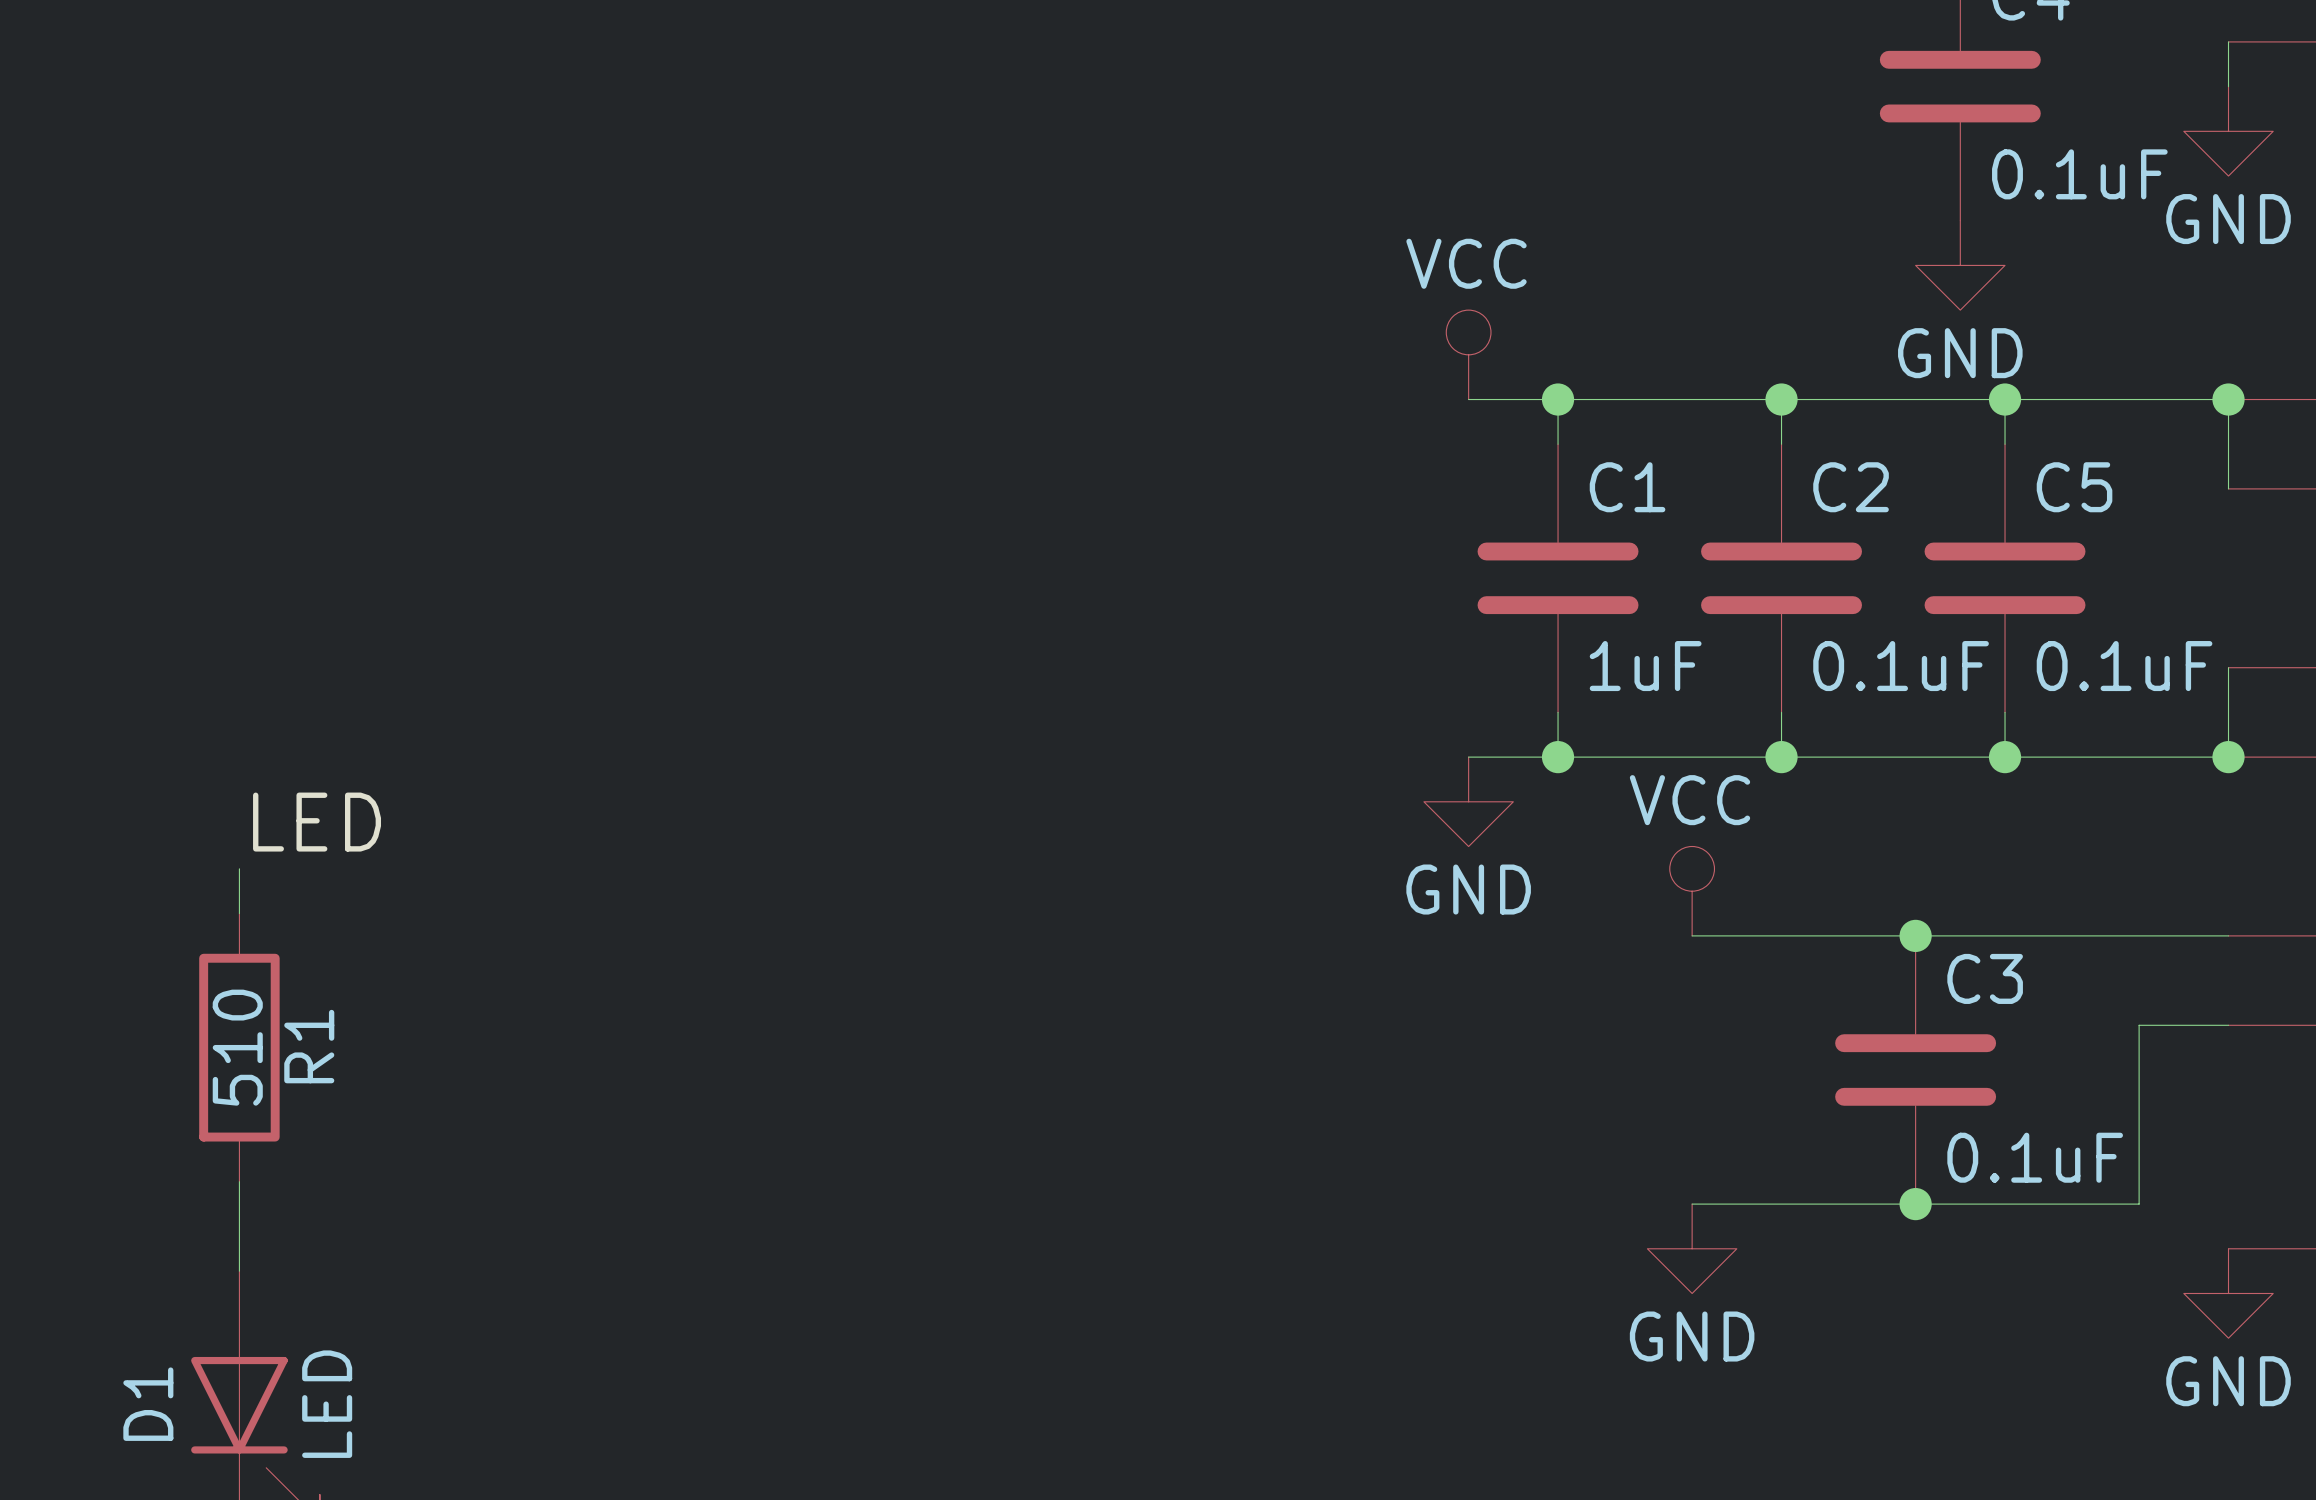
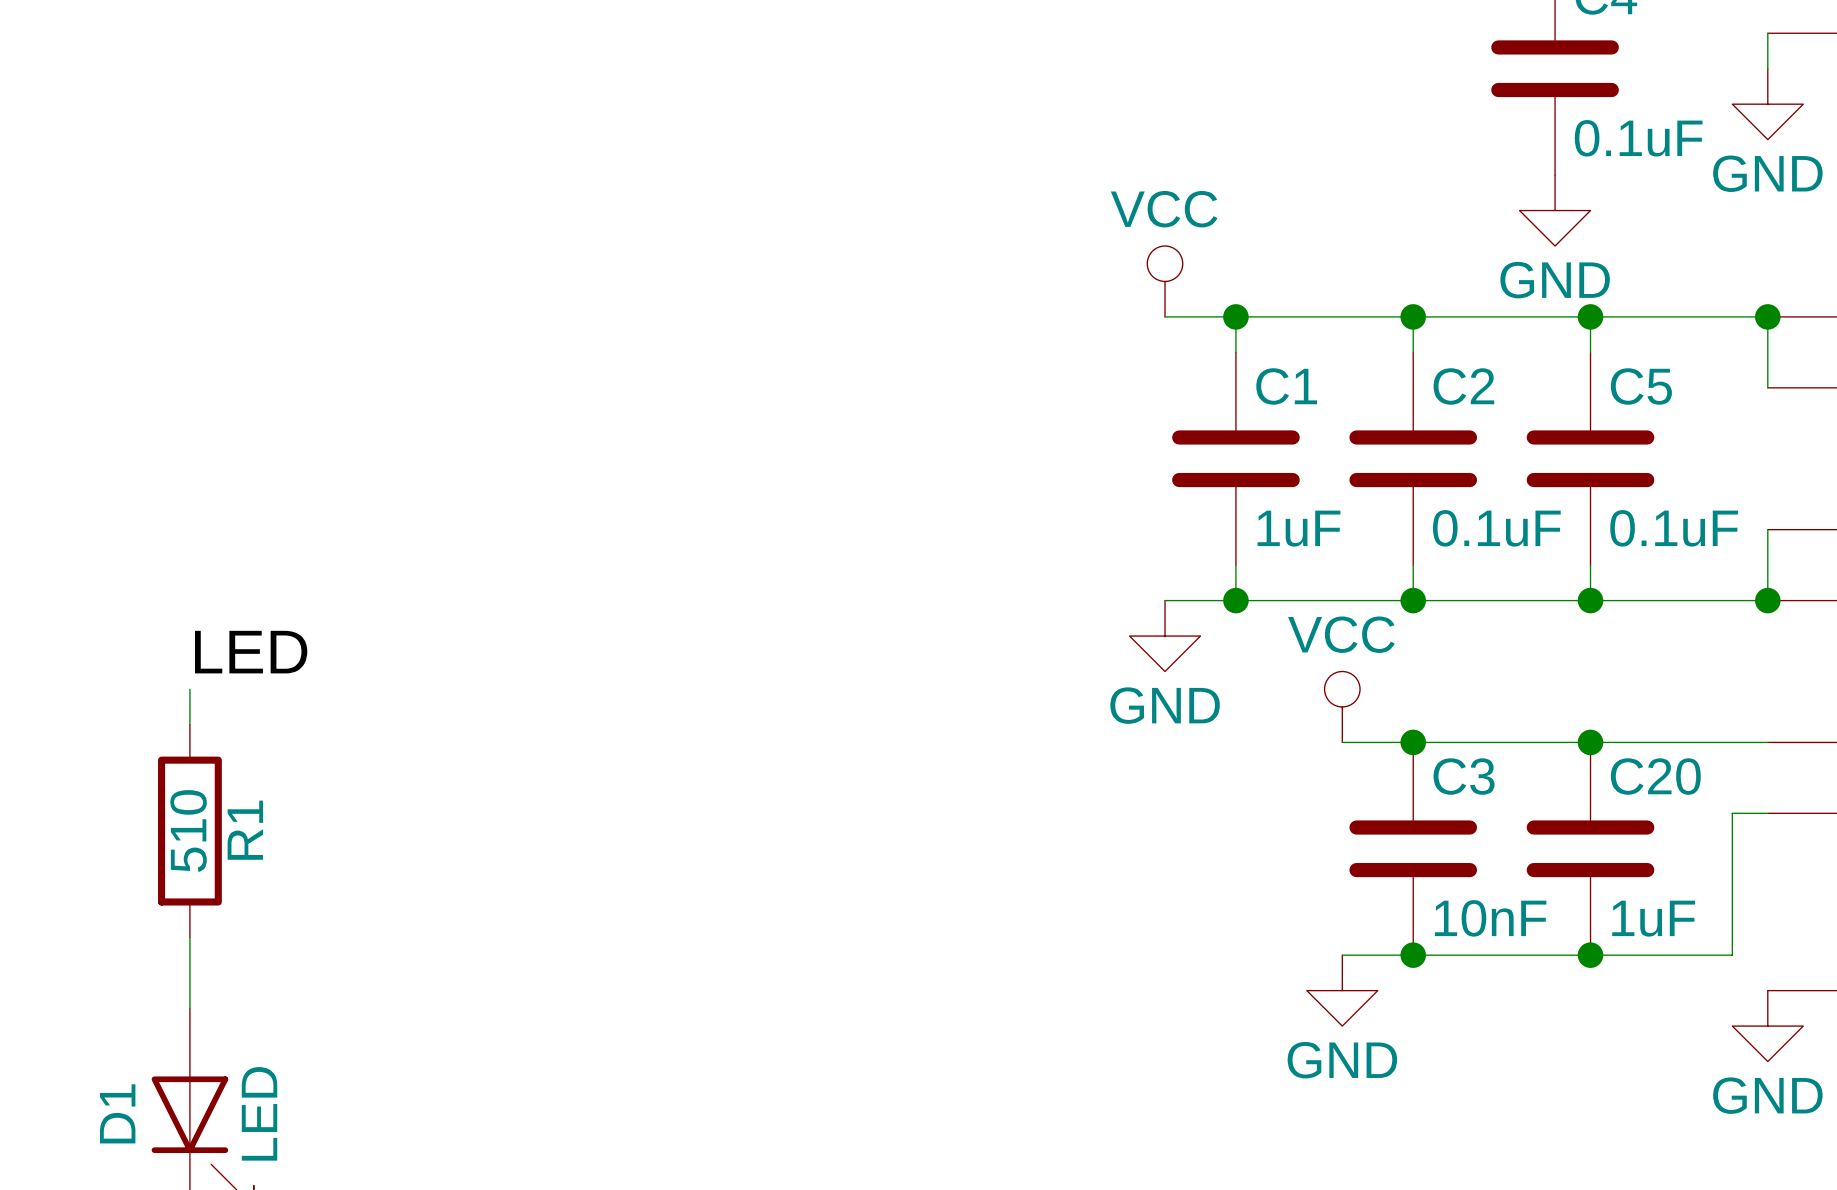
junction: none -> (1413, 742)
junction: (1915, 935) -> none
junction: none -> (1590, 742)
wire: (2183, 1025) (2139, 1025) (2139, 1204) -> (1732, 813) (1732, 955) (1696, 955)
C3 position: (1915, 1070) -> (1413, 848)
C20: none -> 1uF (1590, 848)
C3 value: 0.1uF (2035, 1157) -> 10nF (1490, 918)
junction: none -> (1413, 955)
junction: (1915, 1204) -> none
junction: none -> (1590, 955)

